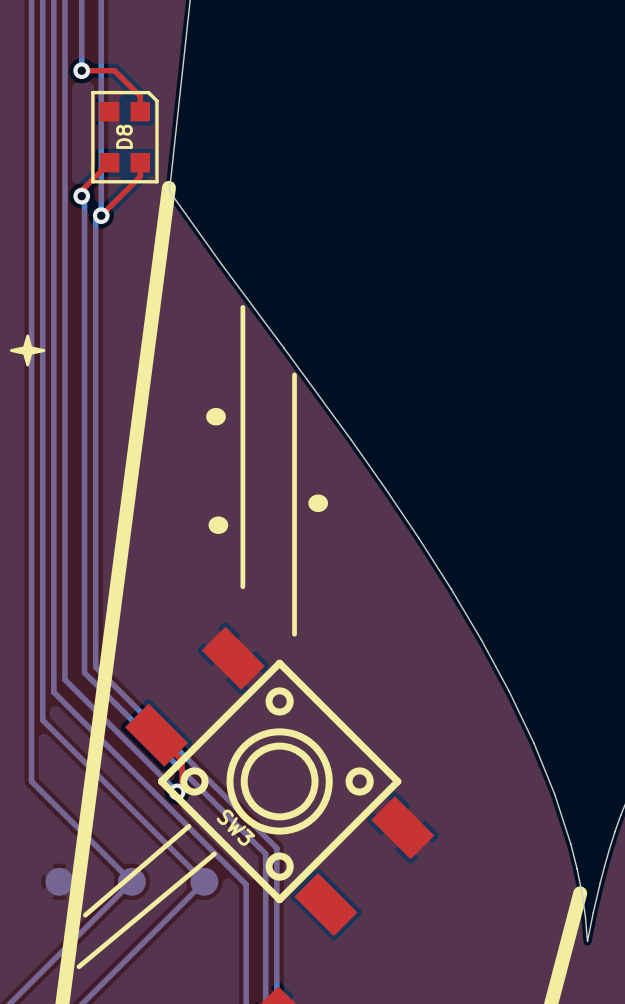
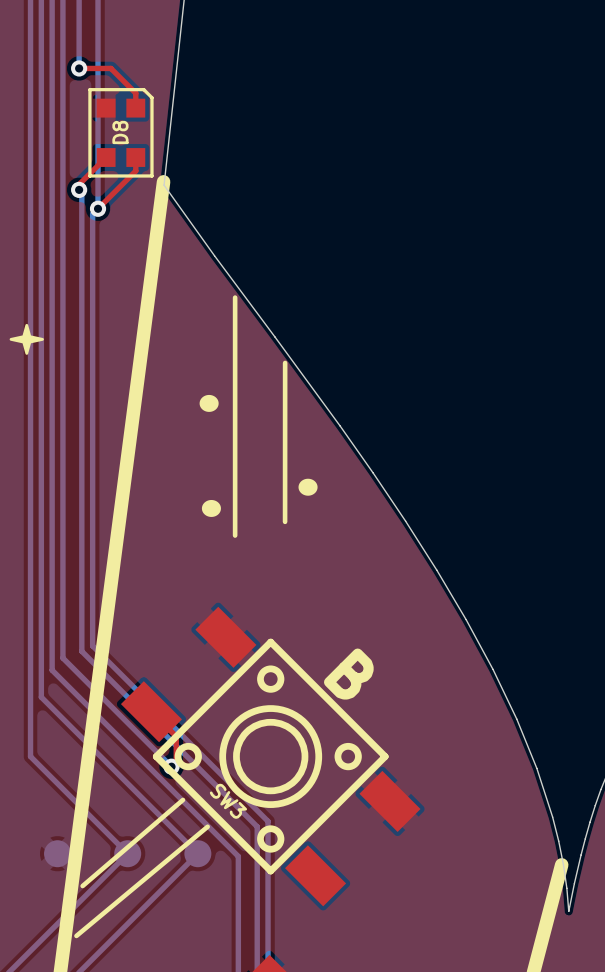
line: (294, 374) (294, 634) -> (285, 362) (285, 521)
line: (242, 553) (242, 586) -> none
text: none -> B (348, 674)

